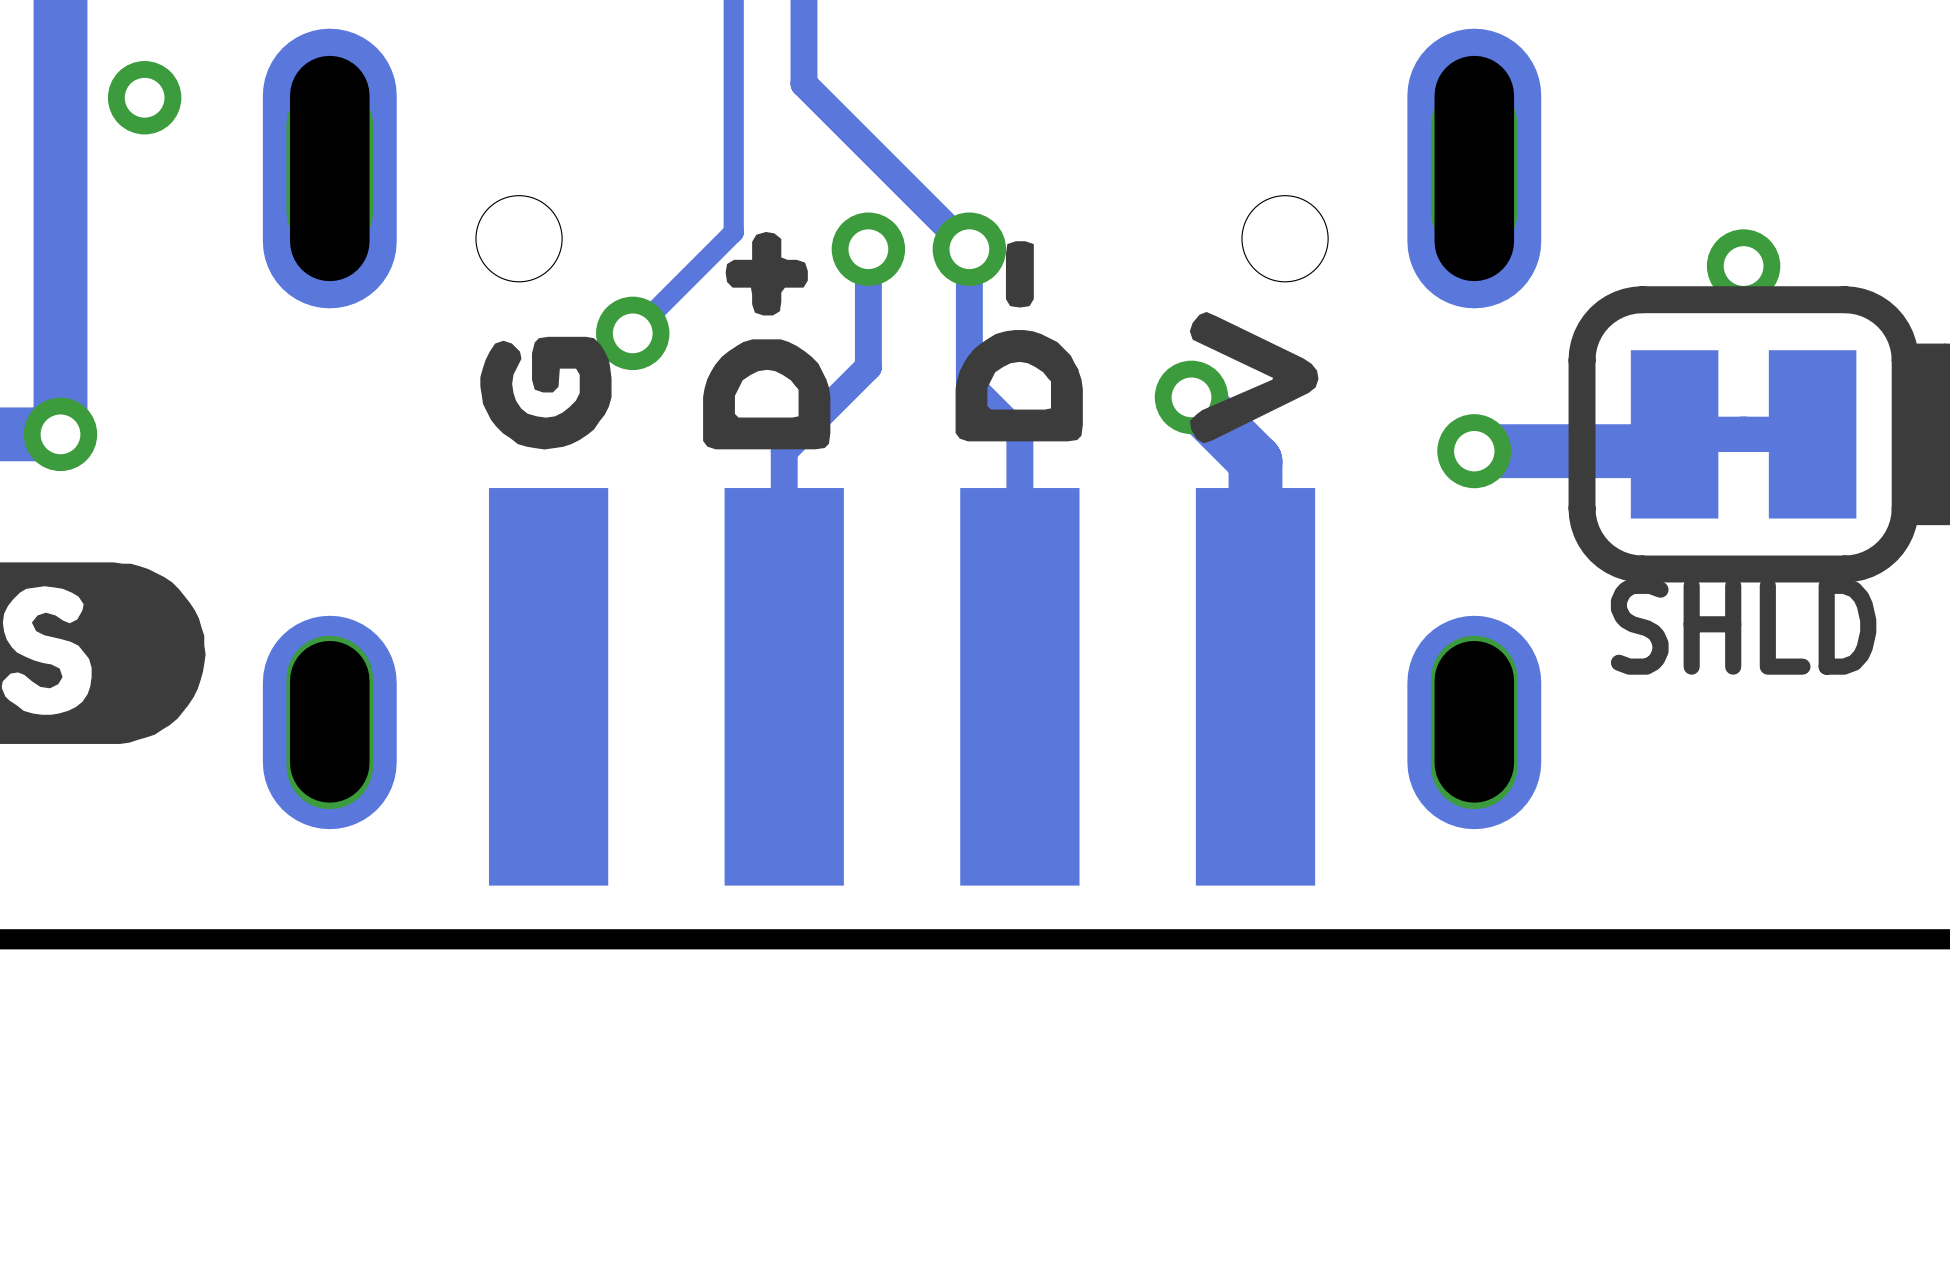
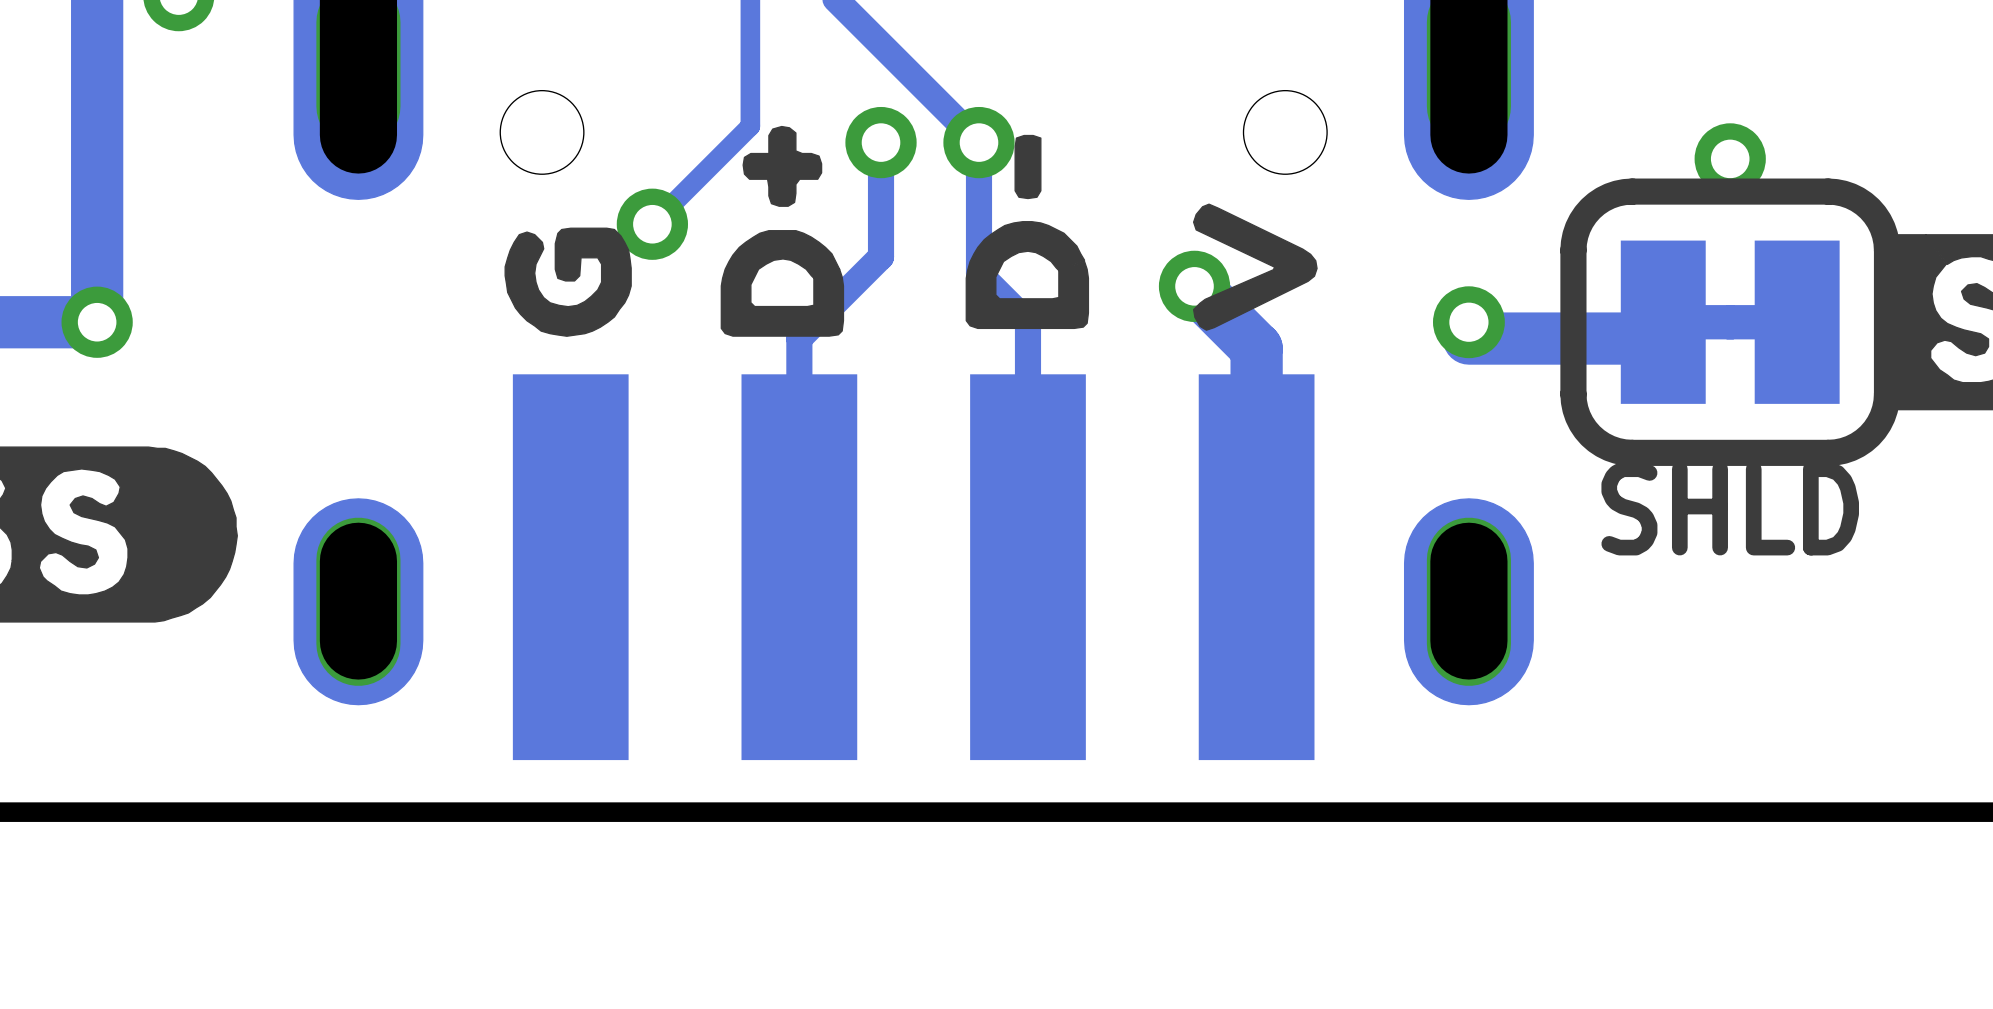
via position: (1474, 451) -> (1468, 322)

